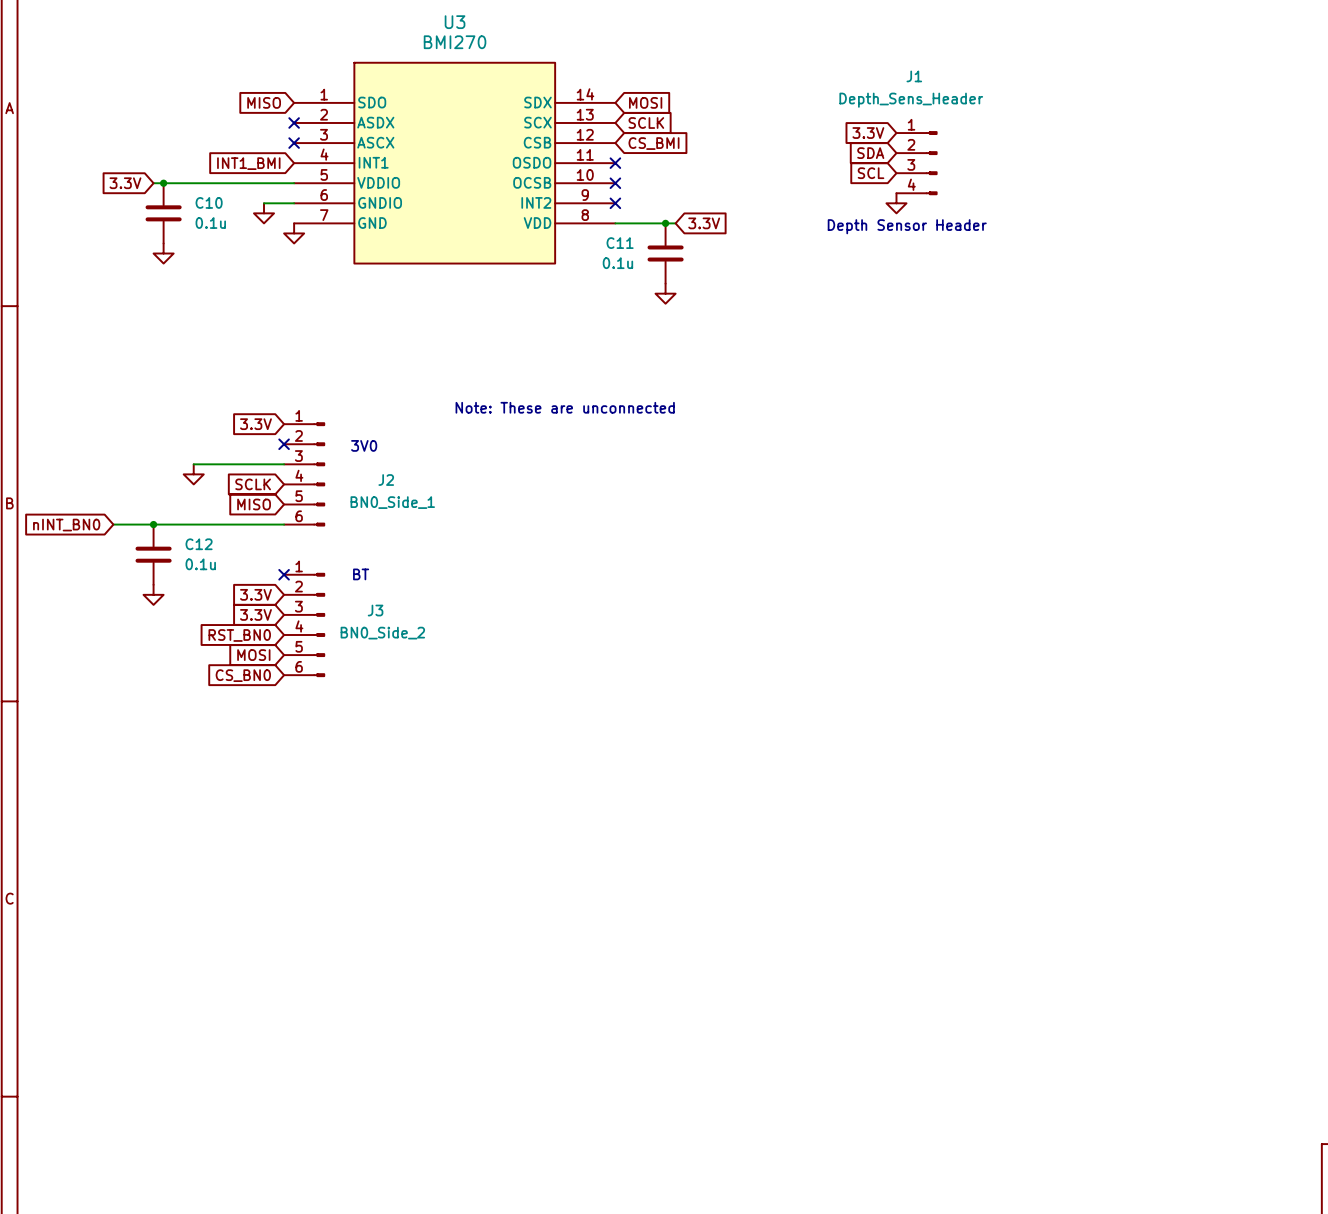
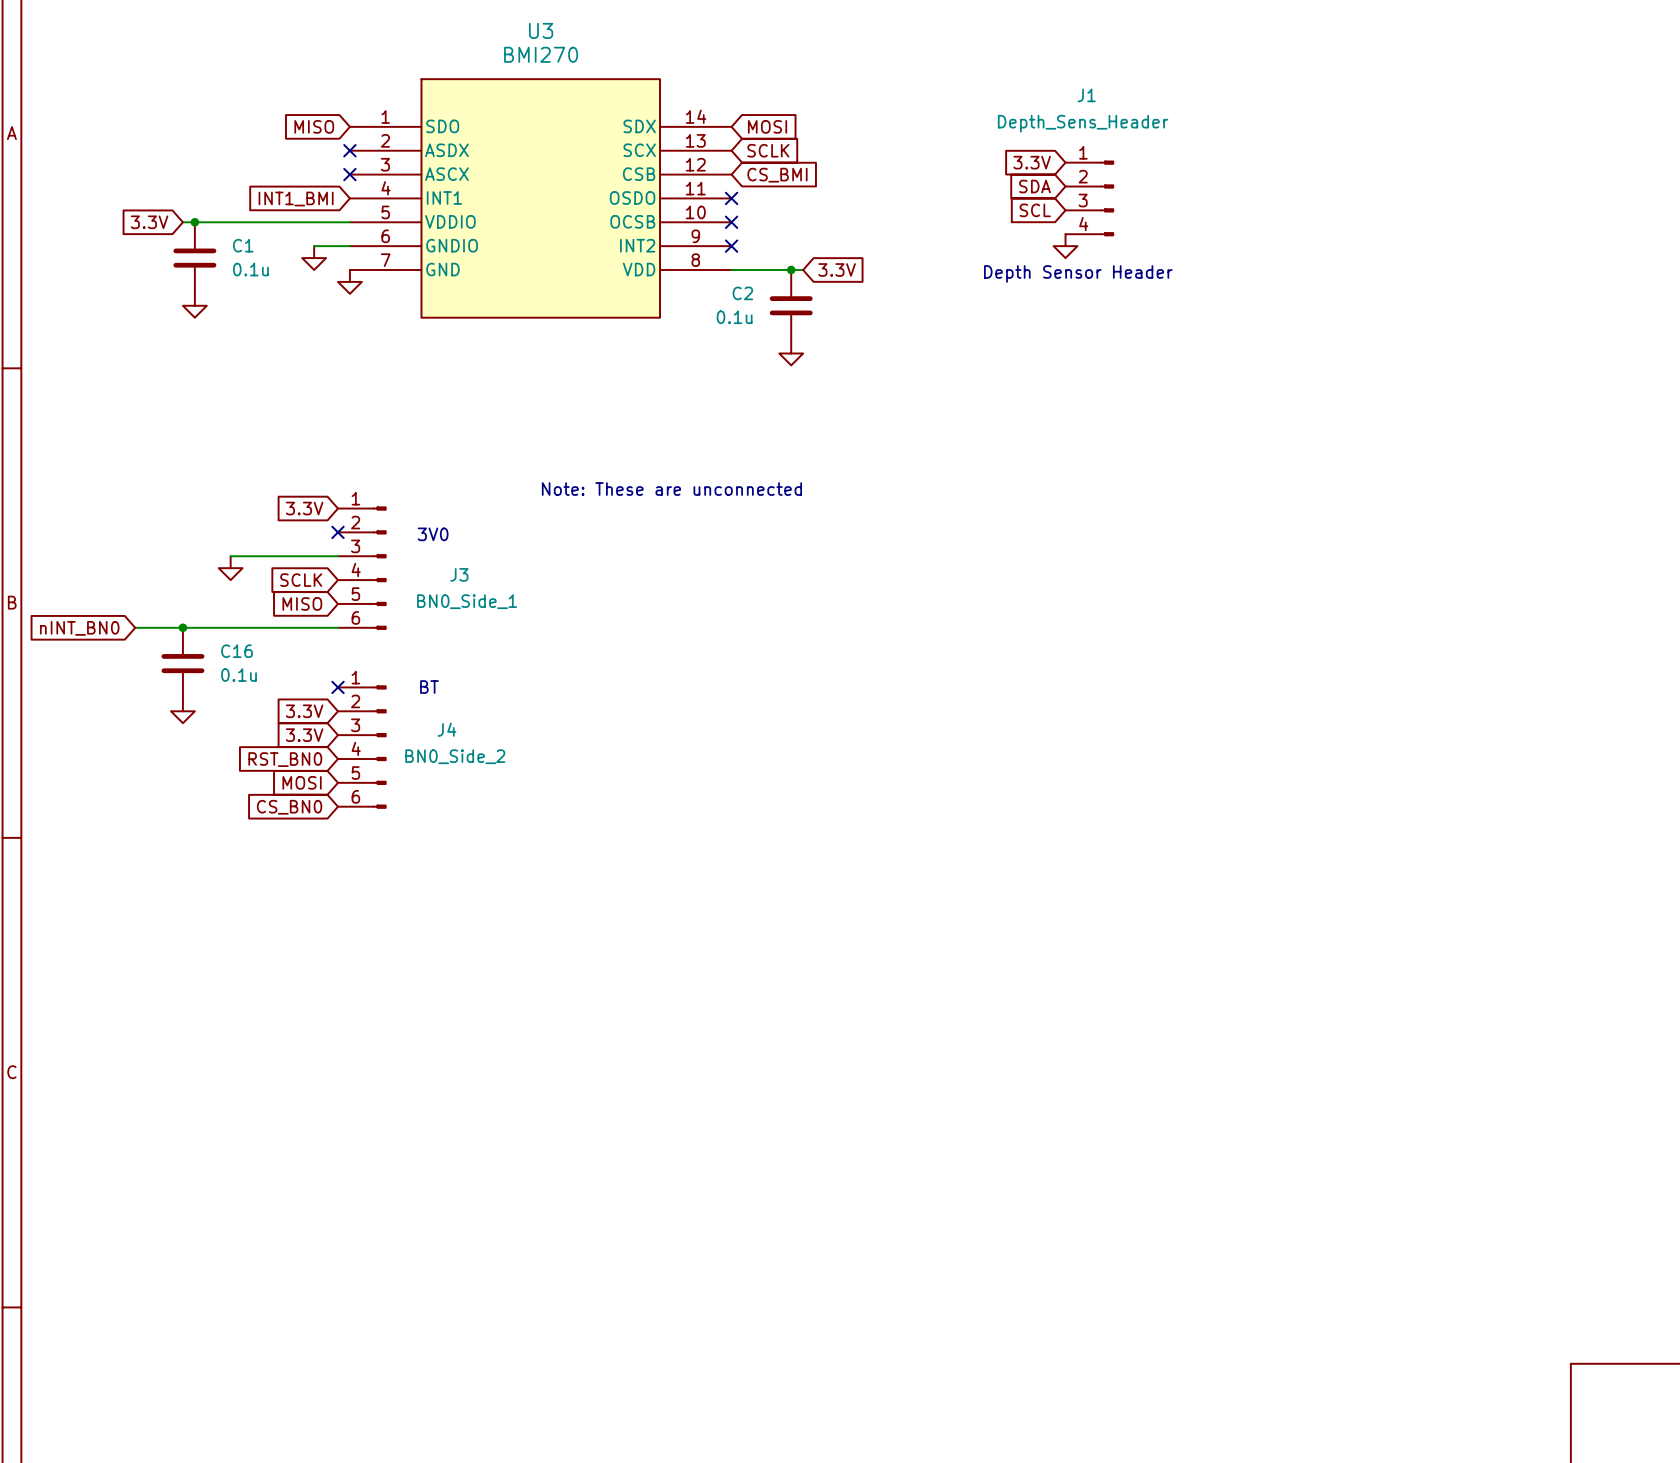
C10 name: C10 (209, 202) -> C1 (243, 245)
C11 name: C11 (620, 243) -> C2 (742, 293)
J2 name: J2 (386, 480) -> J3 (459, 574)
C12 name: C12 (199, 544) -> C16 (236, 651)
J3 name: J3 (375, 610) -> J4 (446, 729)

